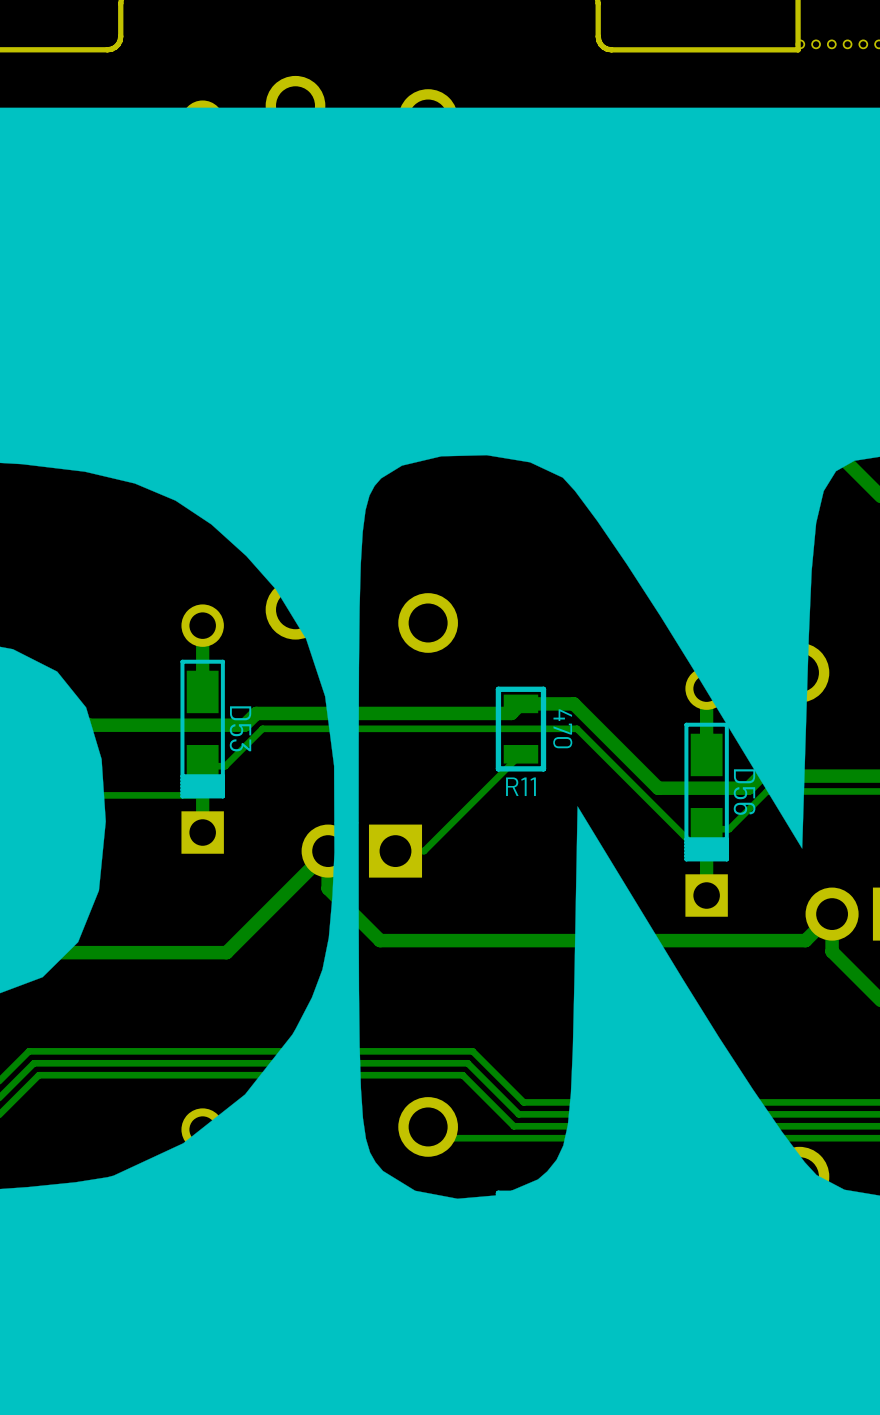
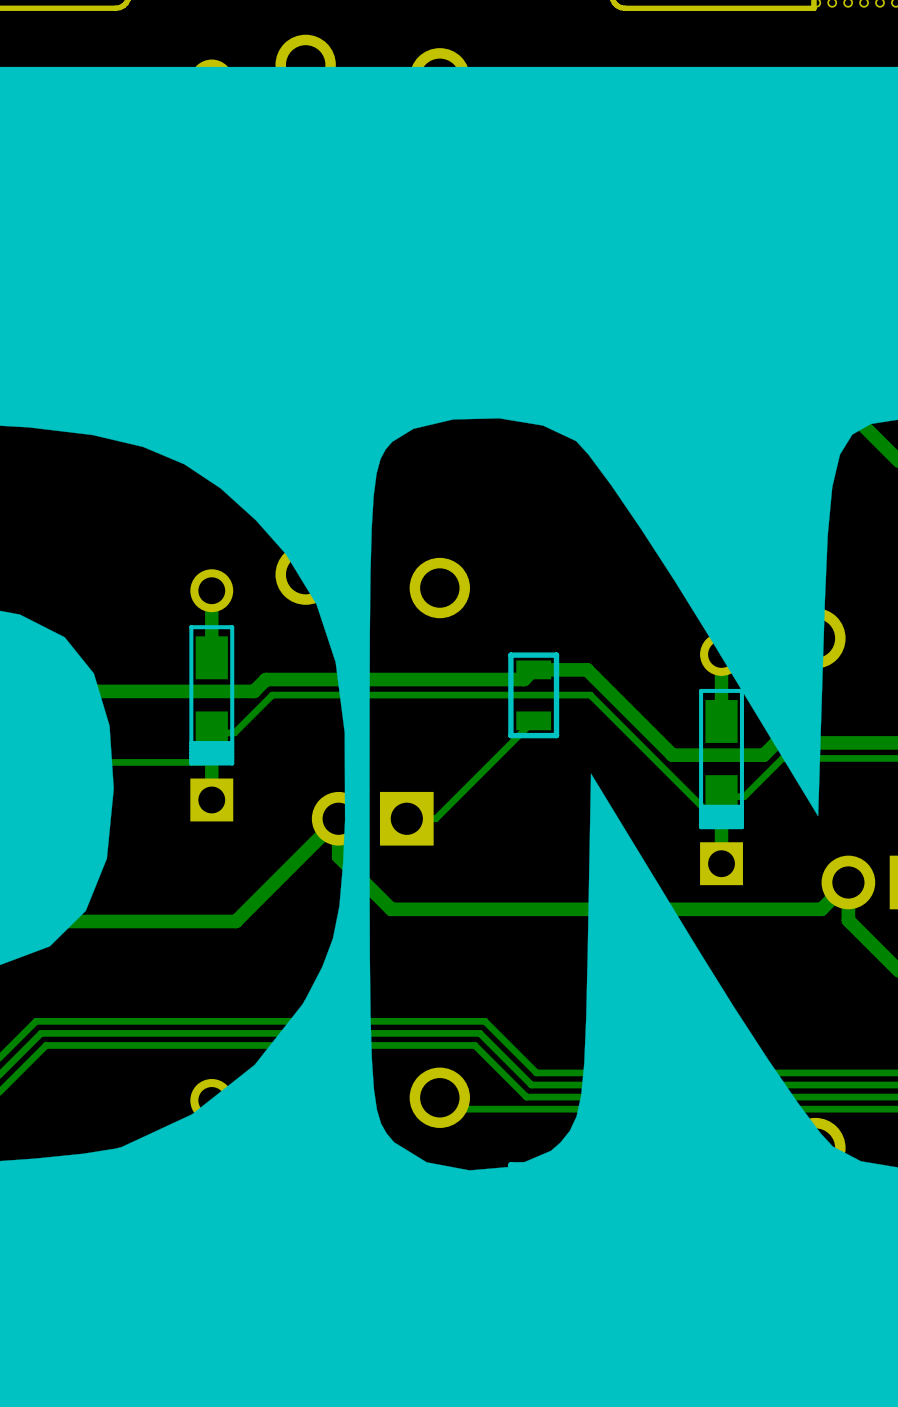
D53 name: D53 (240, 728) -> none
R11 value: 470 (562, 728) -> none
R11 name: R11 (520, 786) -> none
D56 name: D56 (744, 792) -> none

